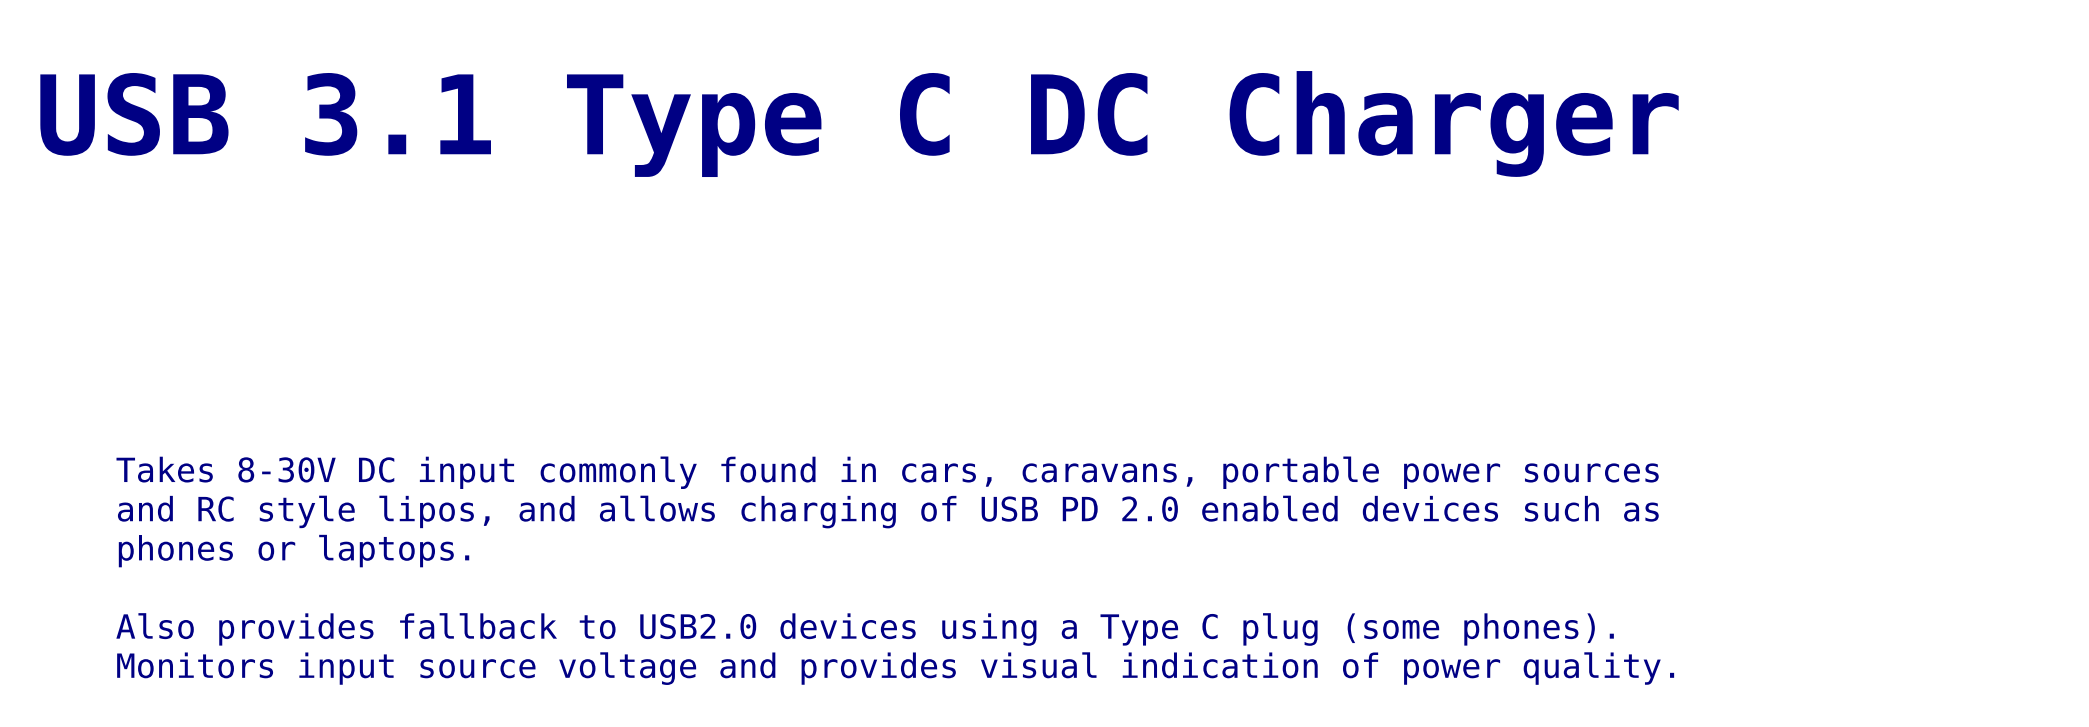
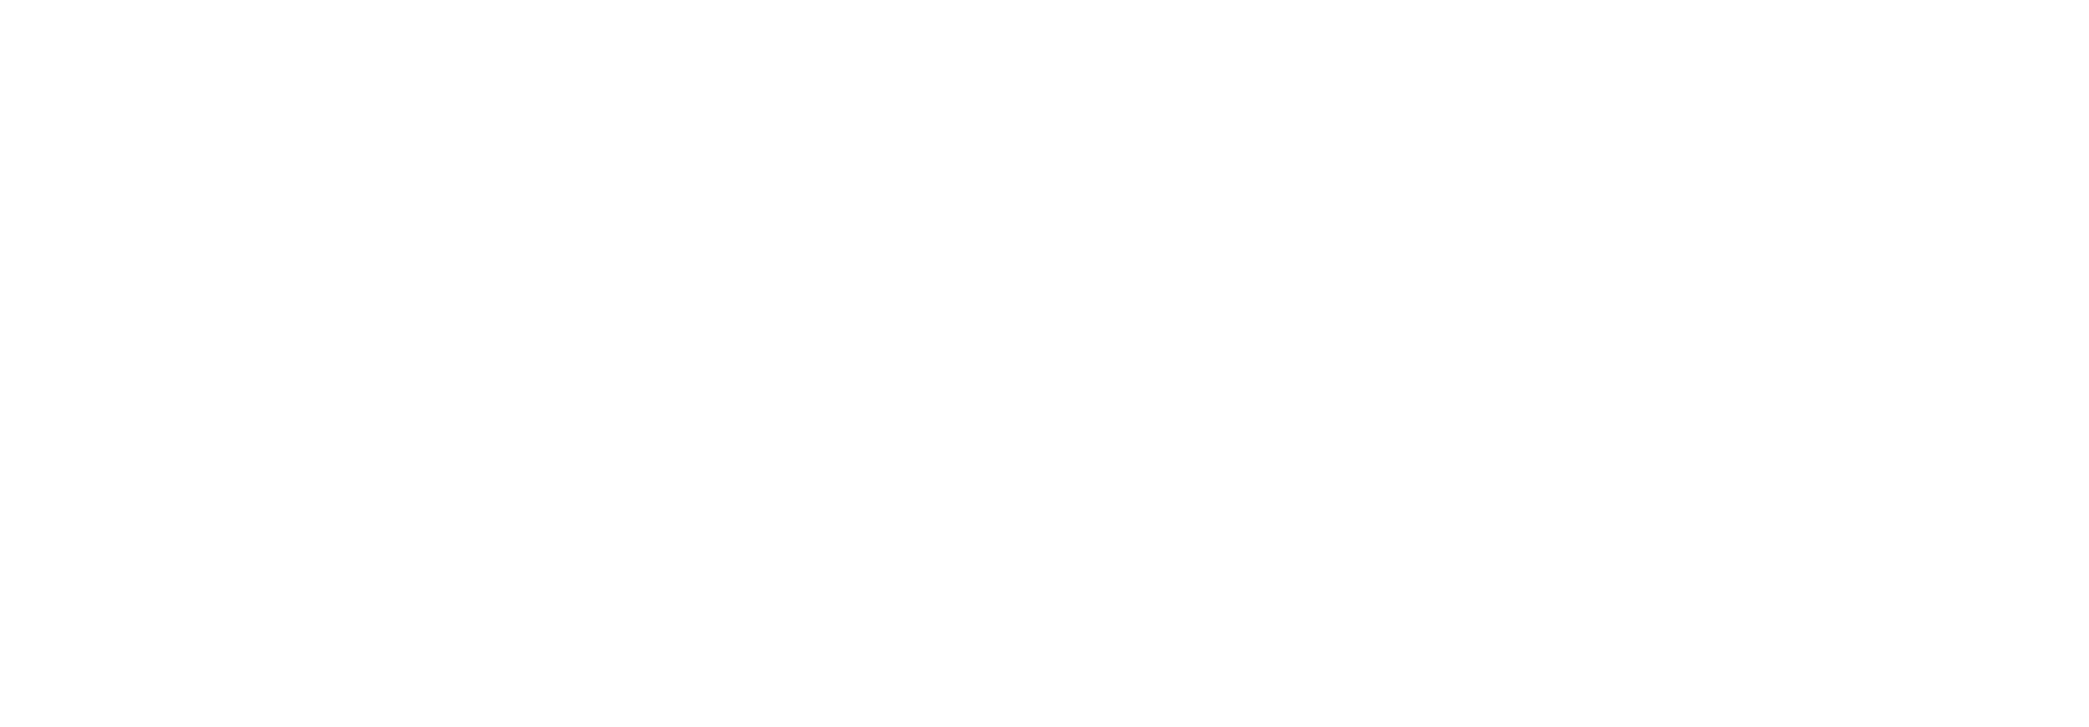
text: USB 3.1 Type C DC Charger (859, 124) -> none
text: Takes 8-30V DC input commonly found in cars, caravans, portable power sources (887, 472) -> none
text: and RC style lipos, and allows charging of USB PD 2.0 enabled devices such as (888, 512) -> none
text: phones or laptops. (294, 551) -> none
text: Also provides fallback to USB2.0 devices using a Type C plug (some phones). (865, 629) -> none
text: Monitors input source voltage and provides visual indication of power quality. (895, 668) -> none

